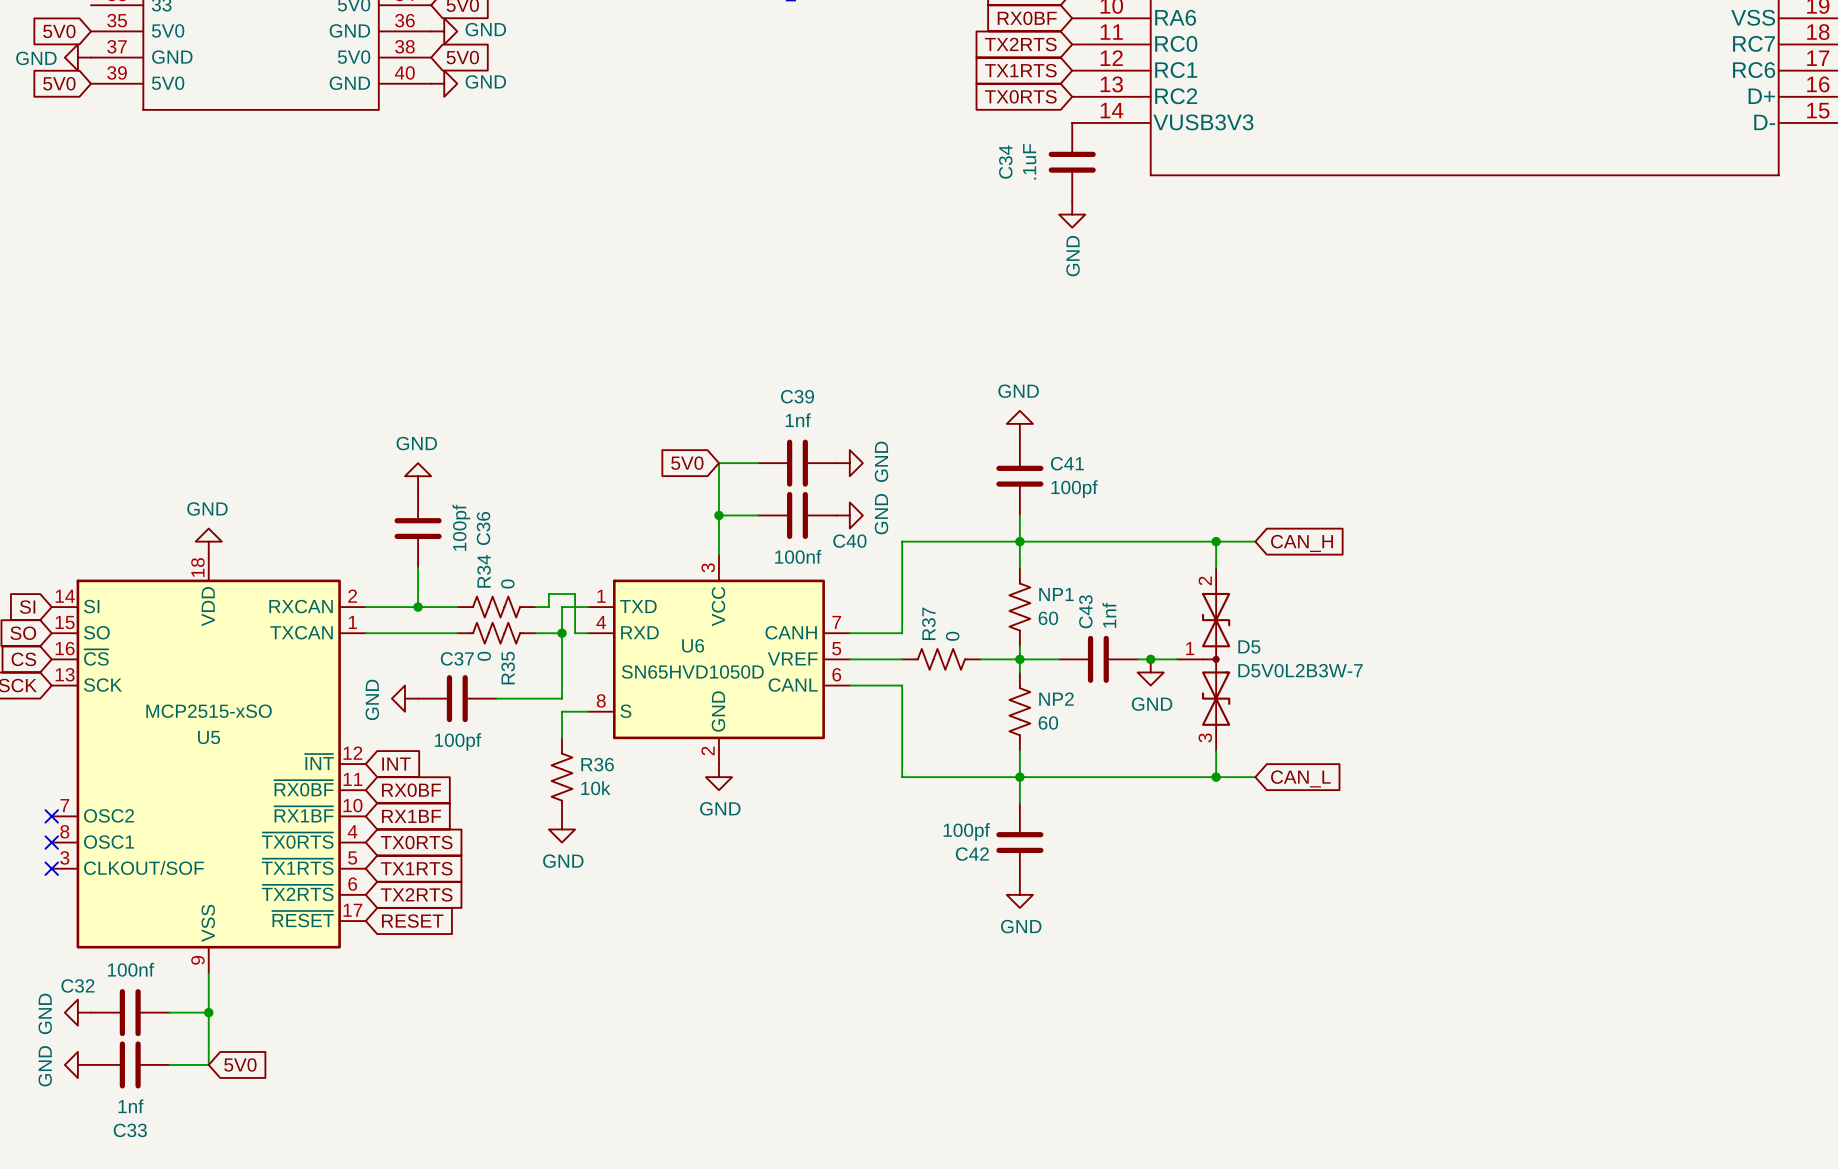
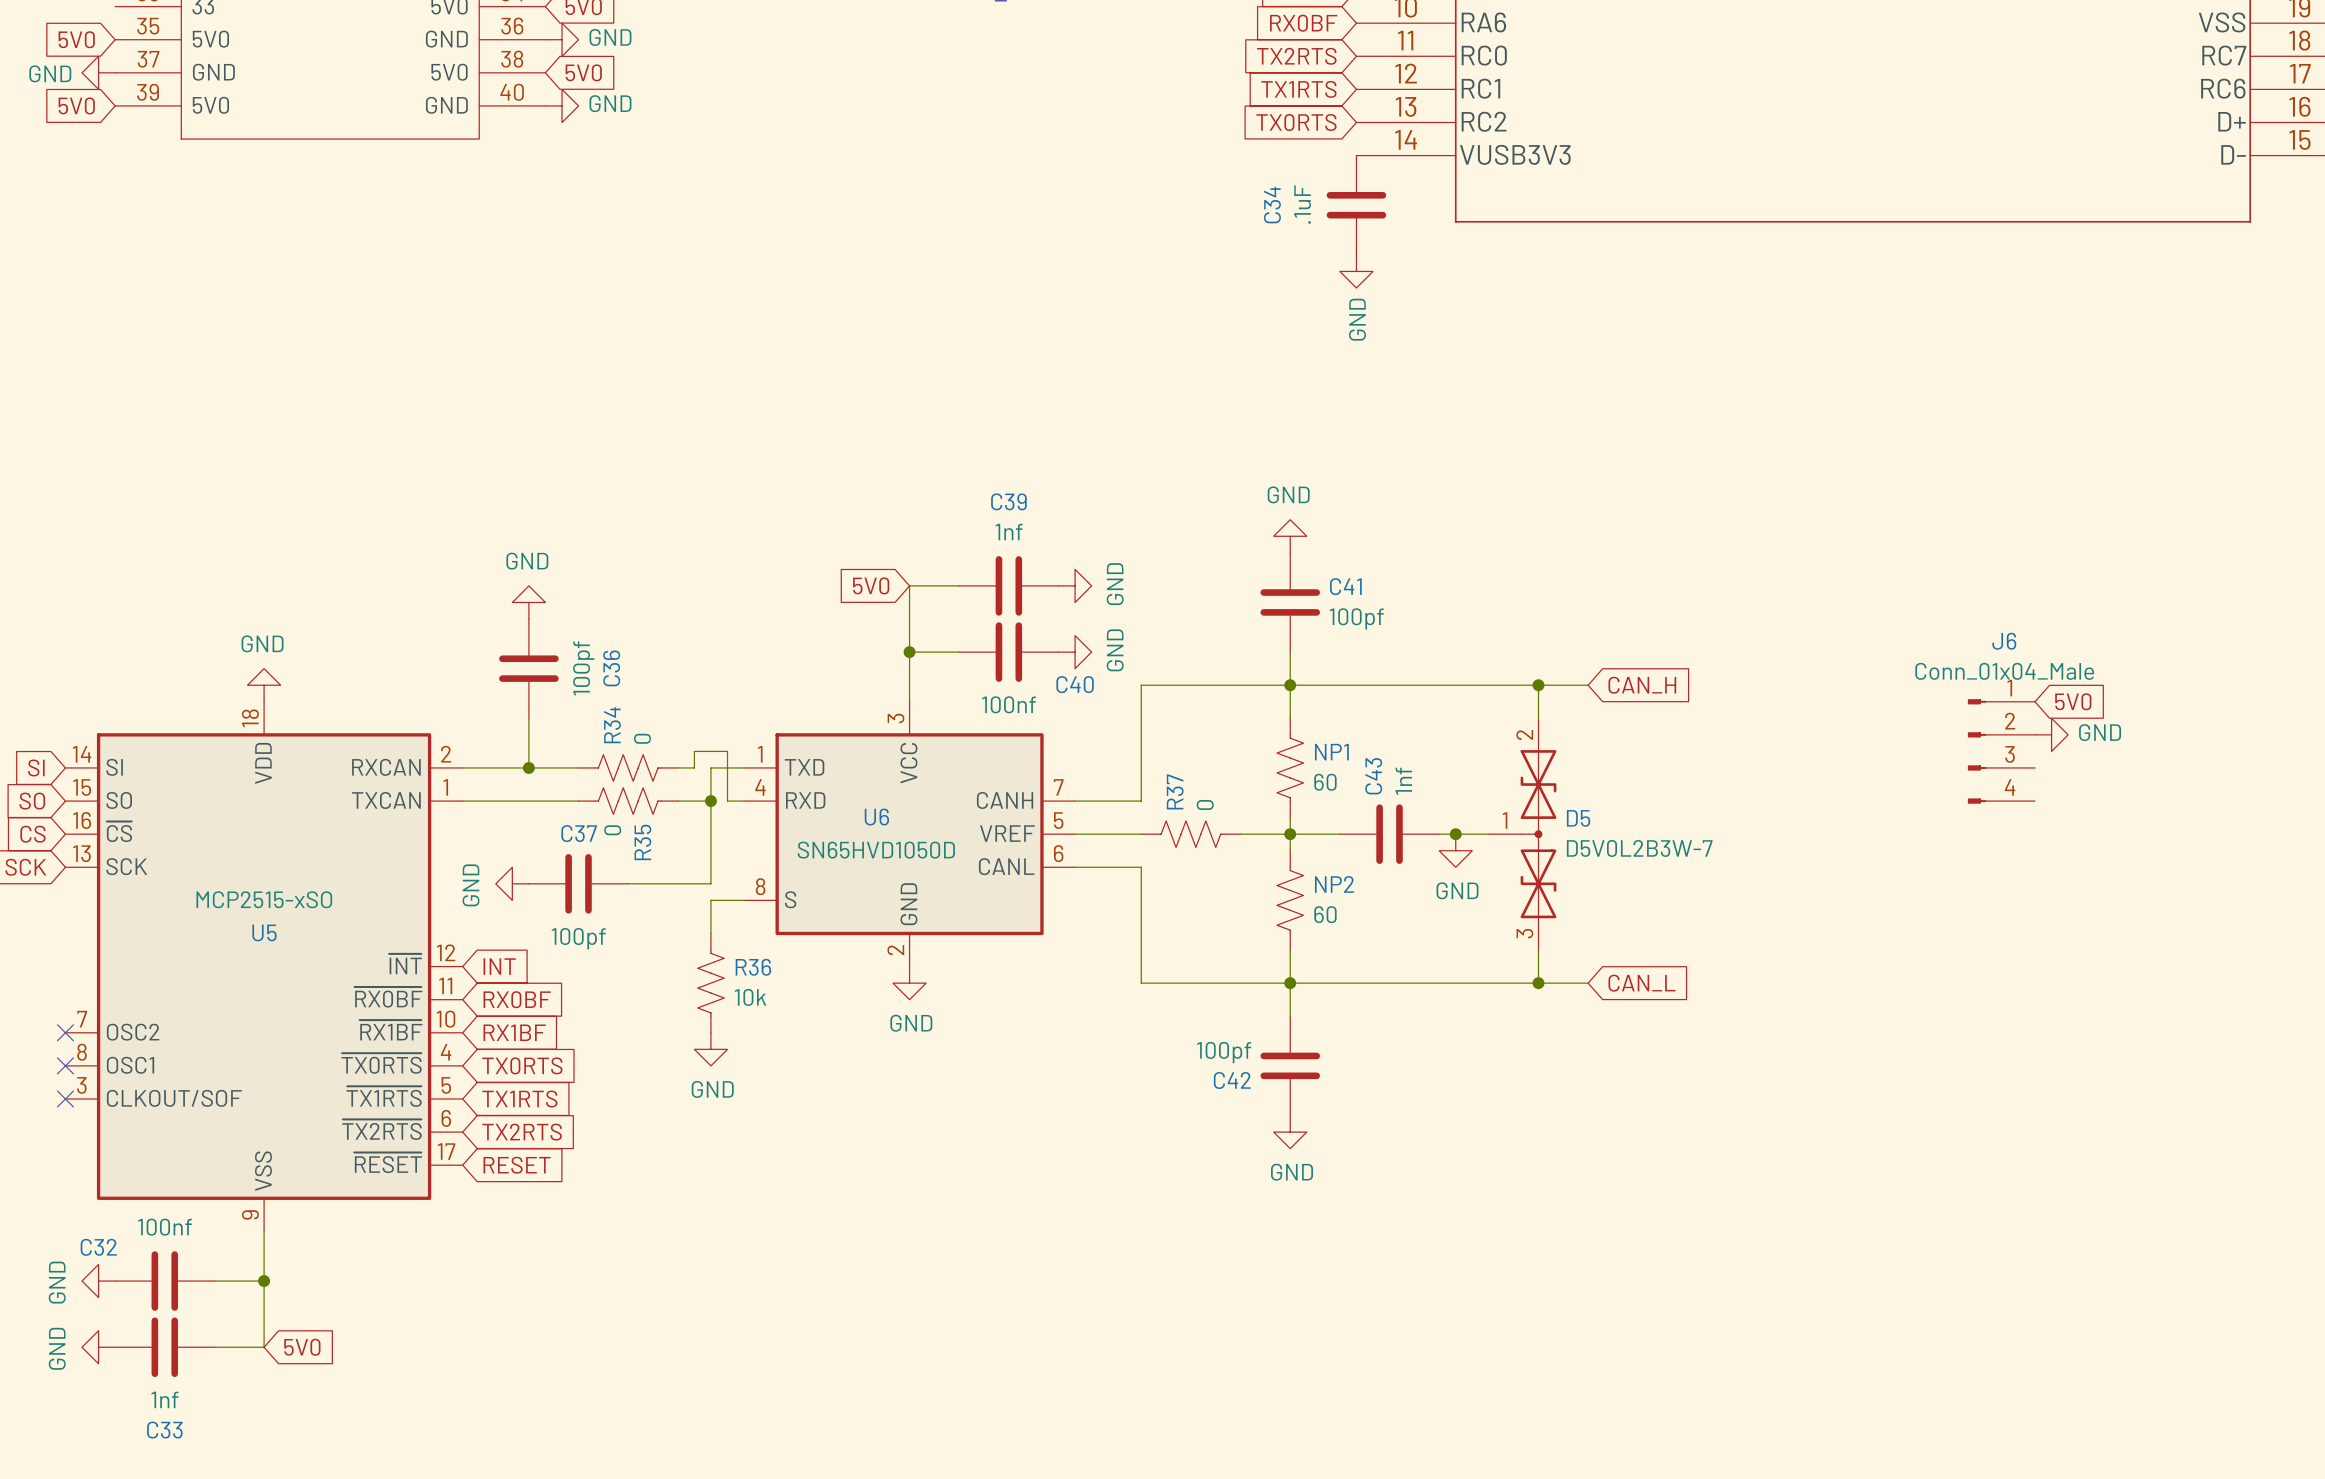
global label: none -> 5V0 (2073, 701)
power symbol: none -> GND (2051, 734)
J6: none -> Conn_01x04_Male (2001, 751)

